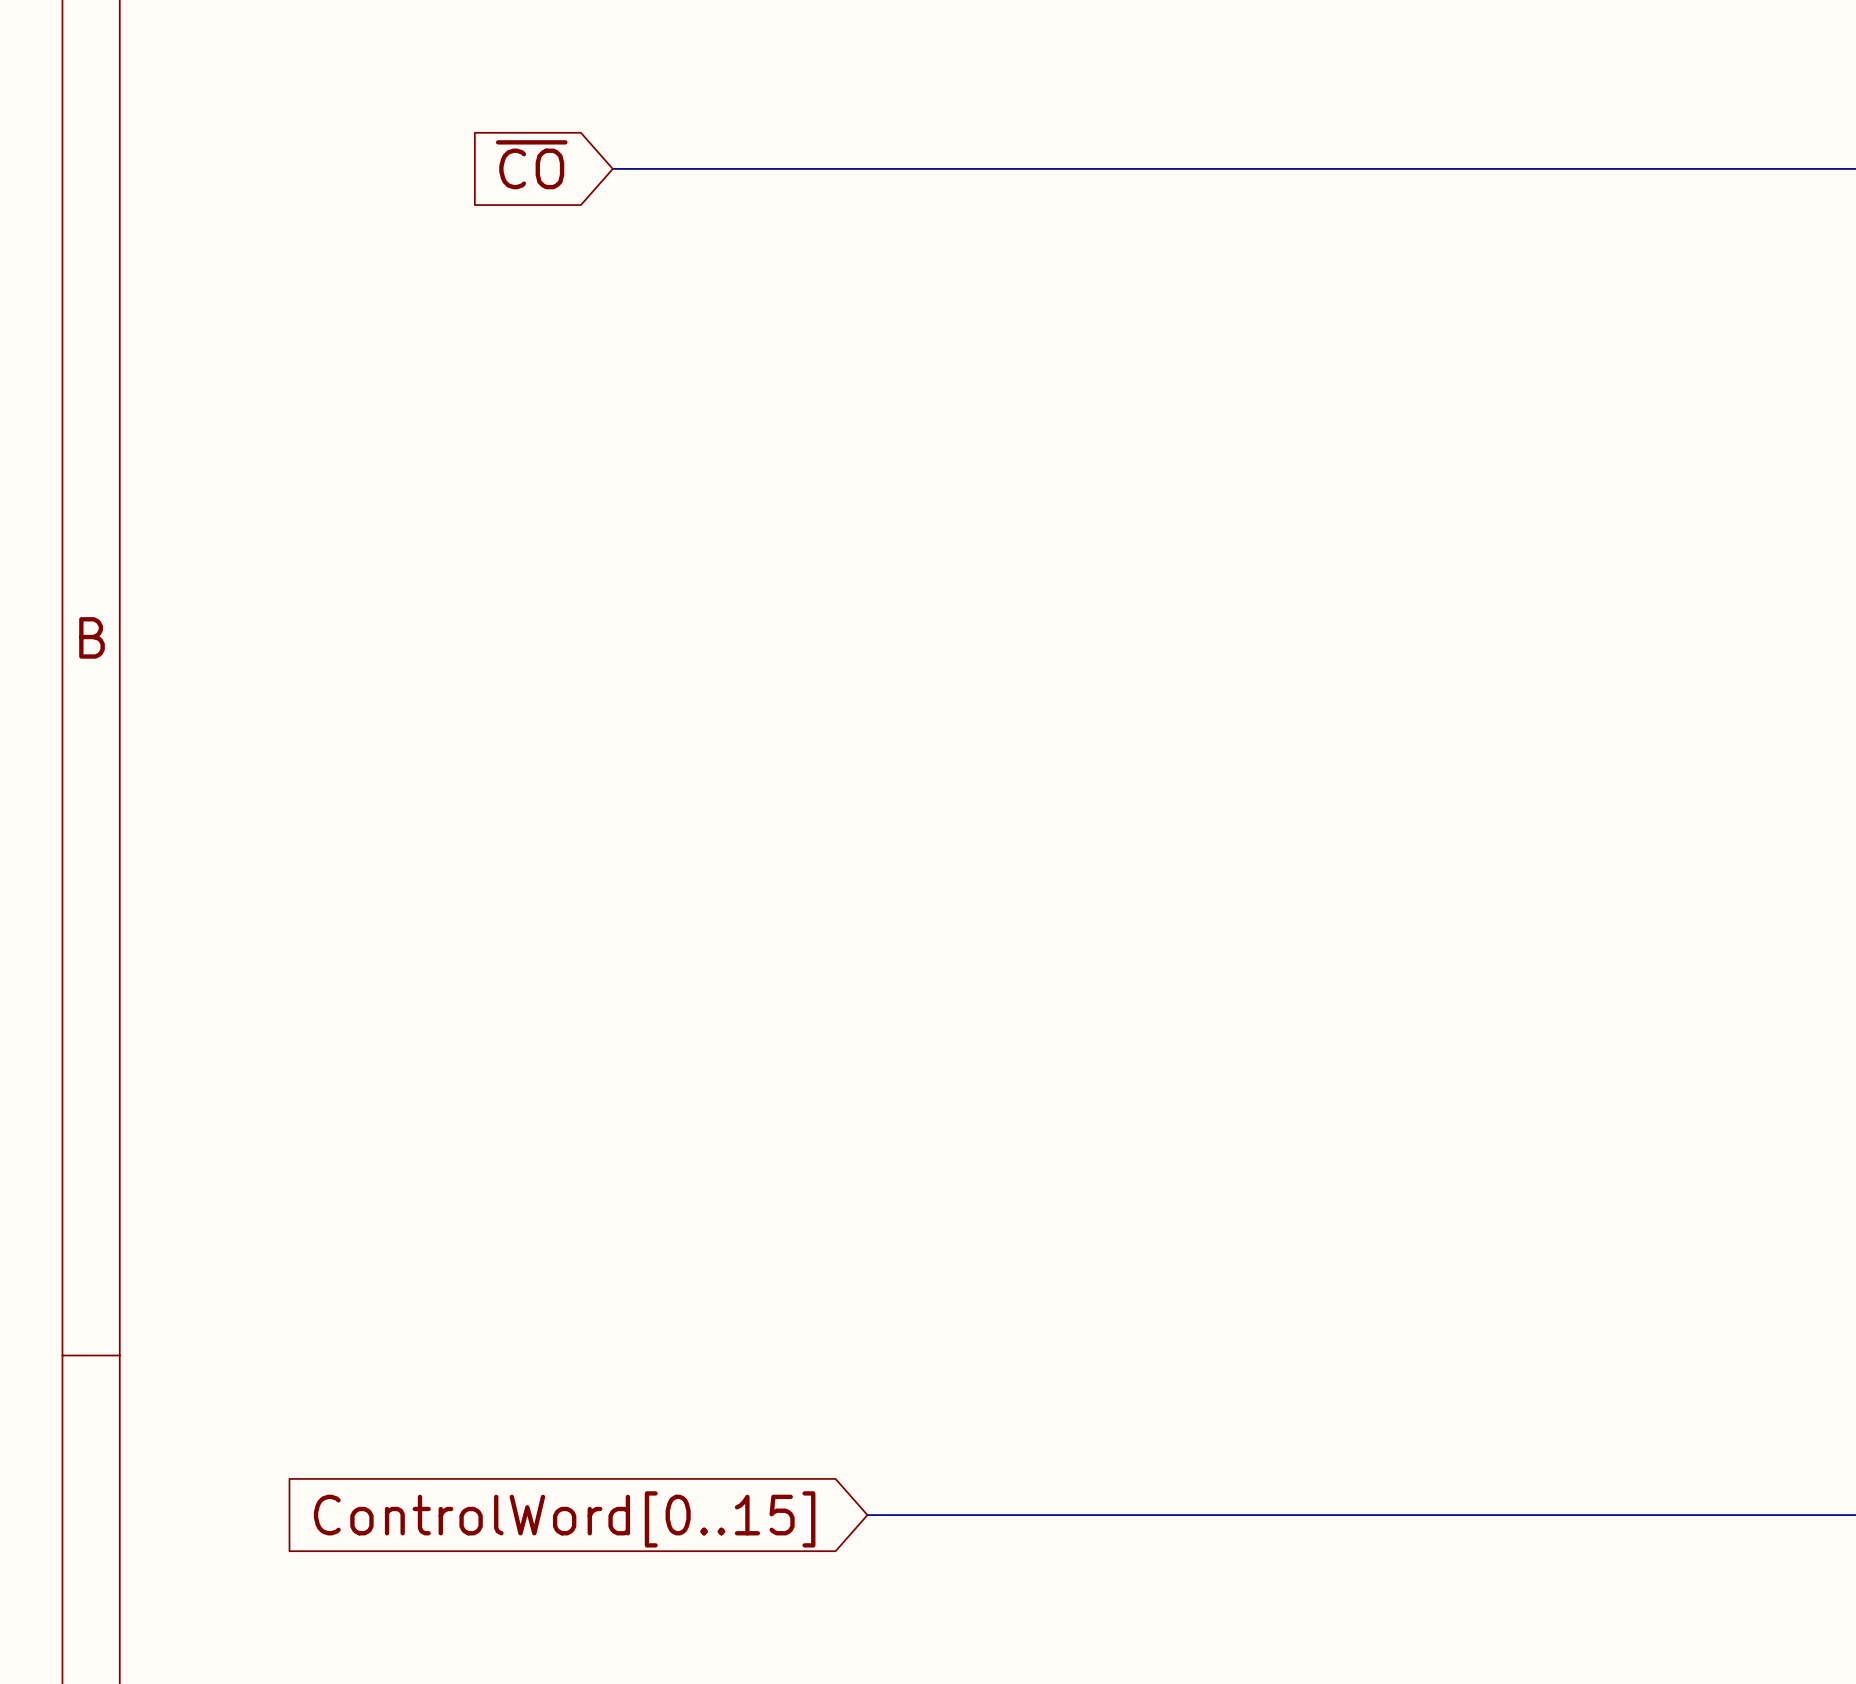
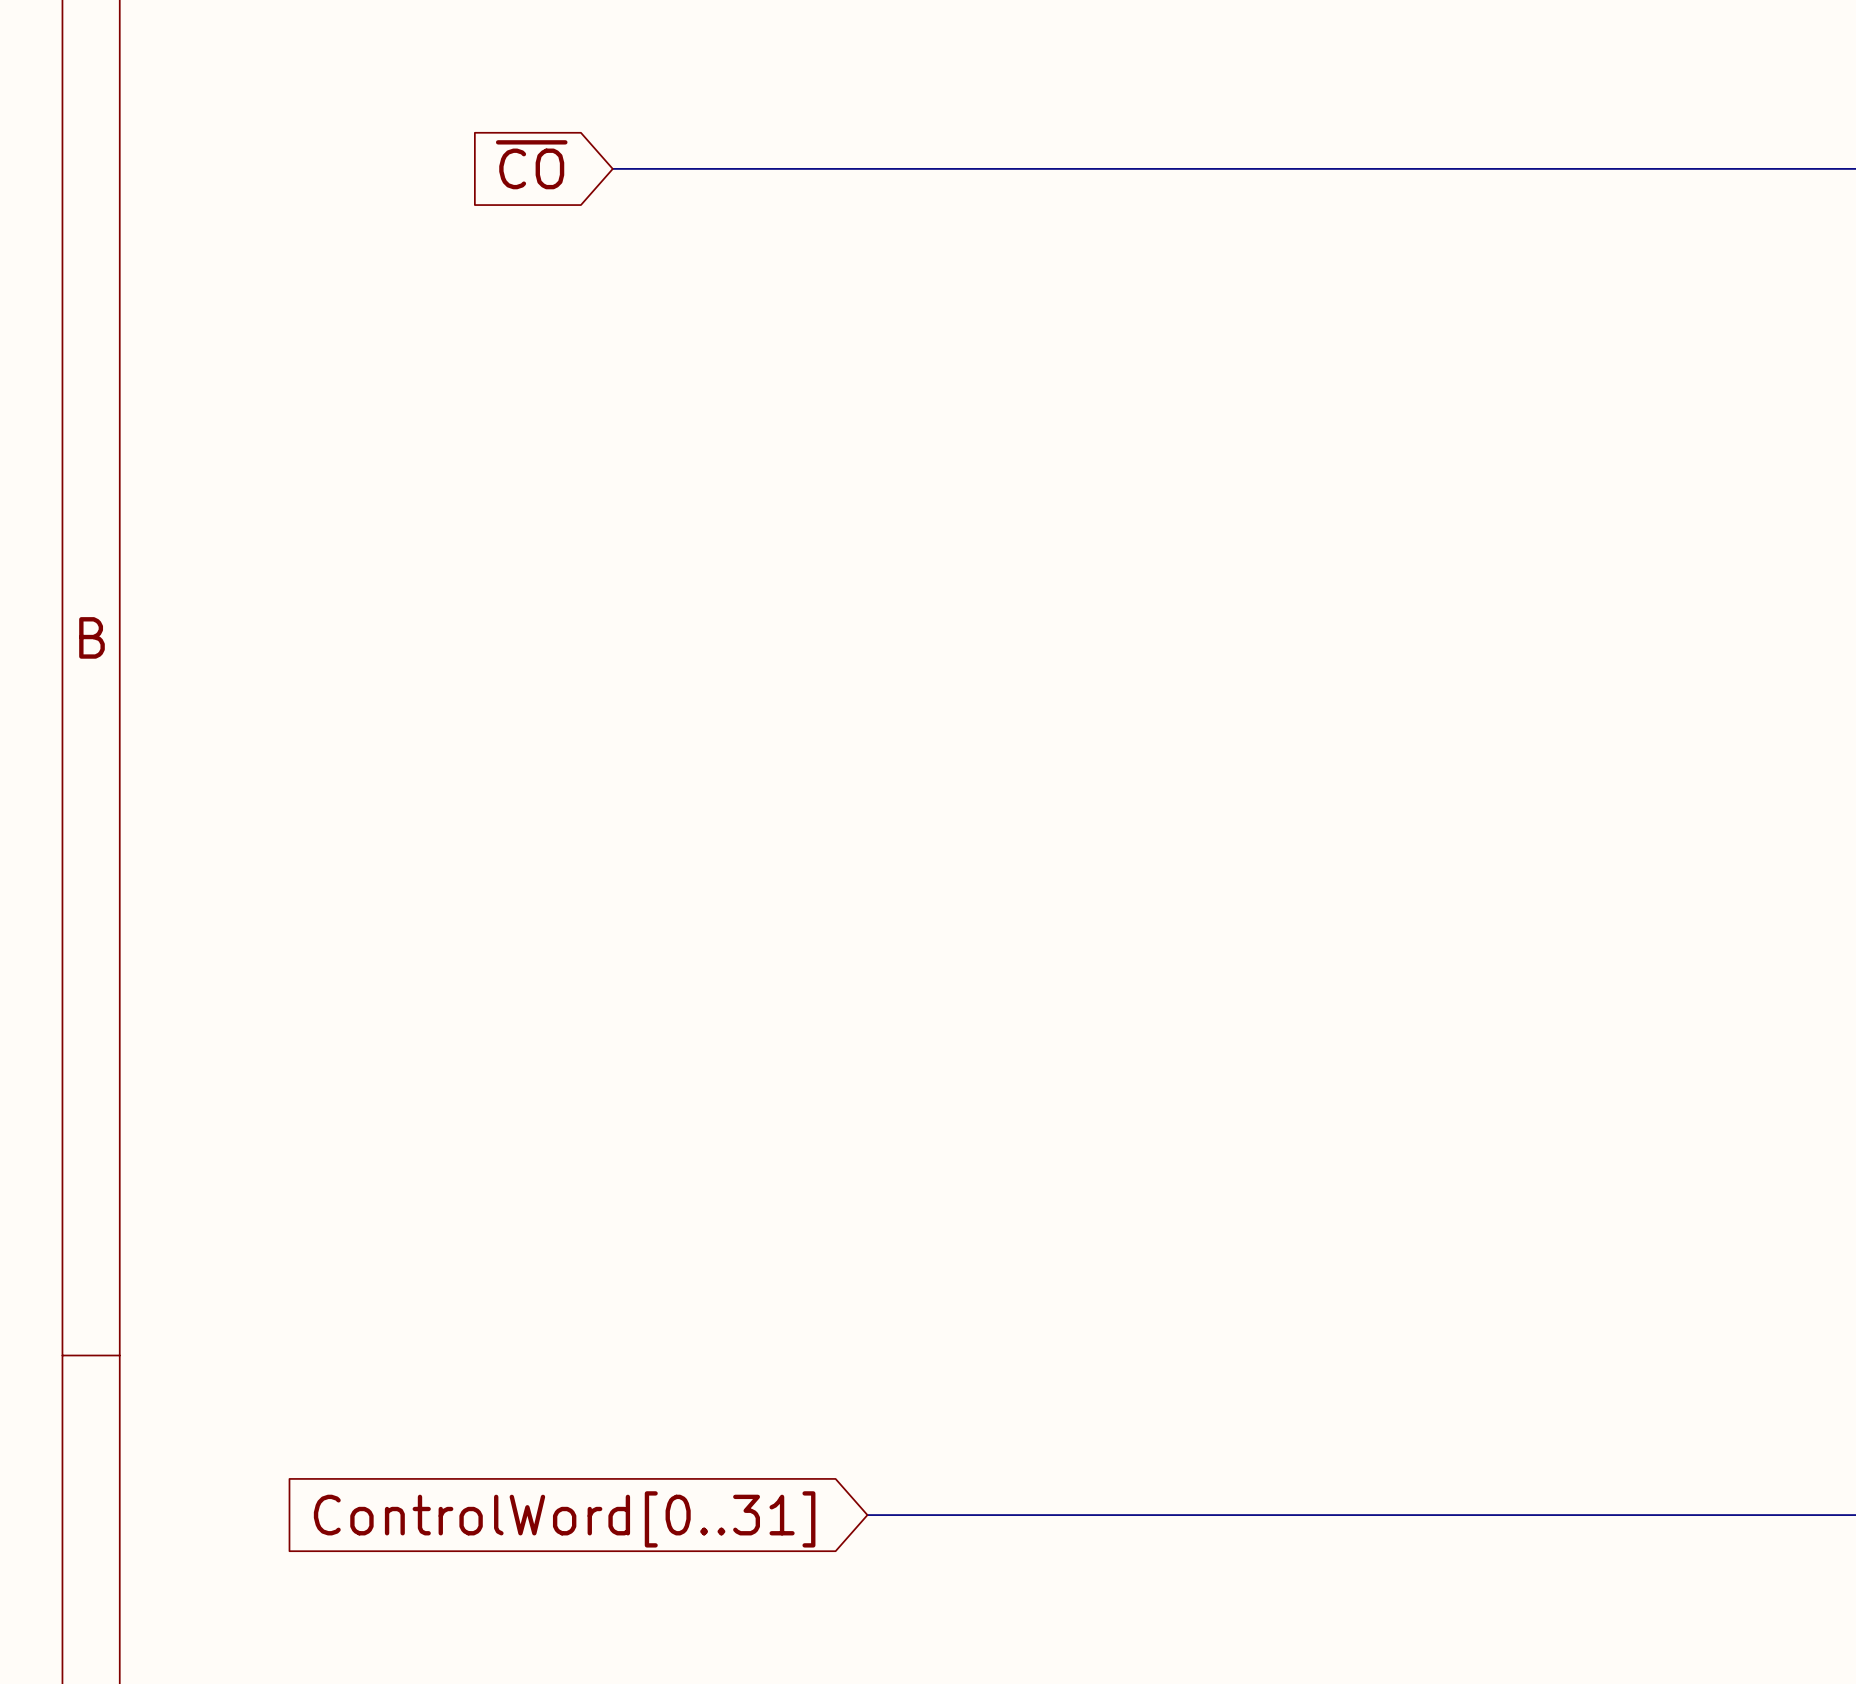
global label: ControlWord[0..15] (564, 1519) -> ControlWord[0..31] (564, 1519)

